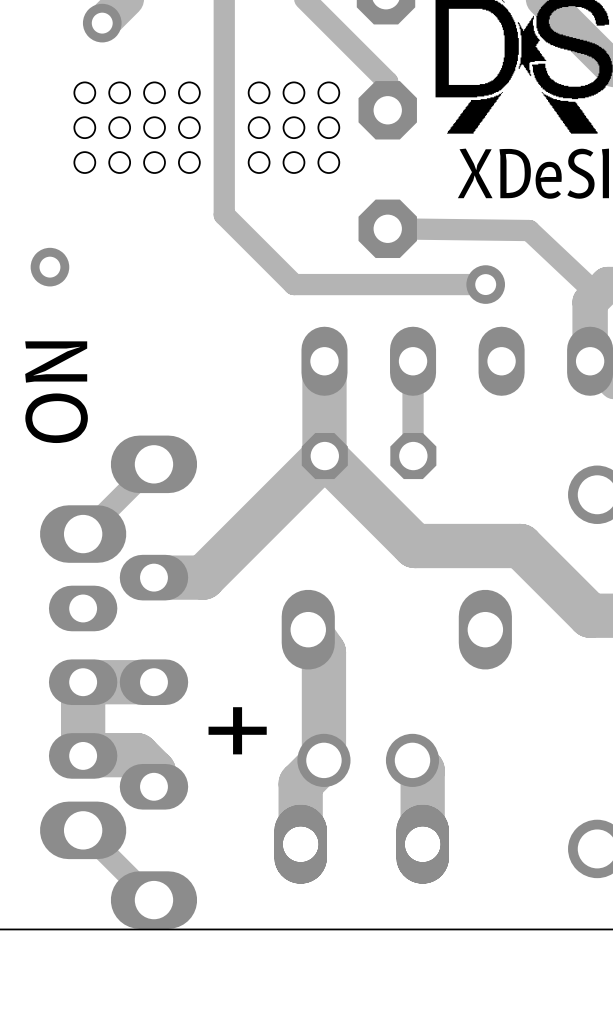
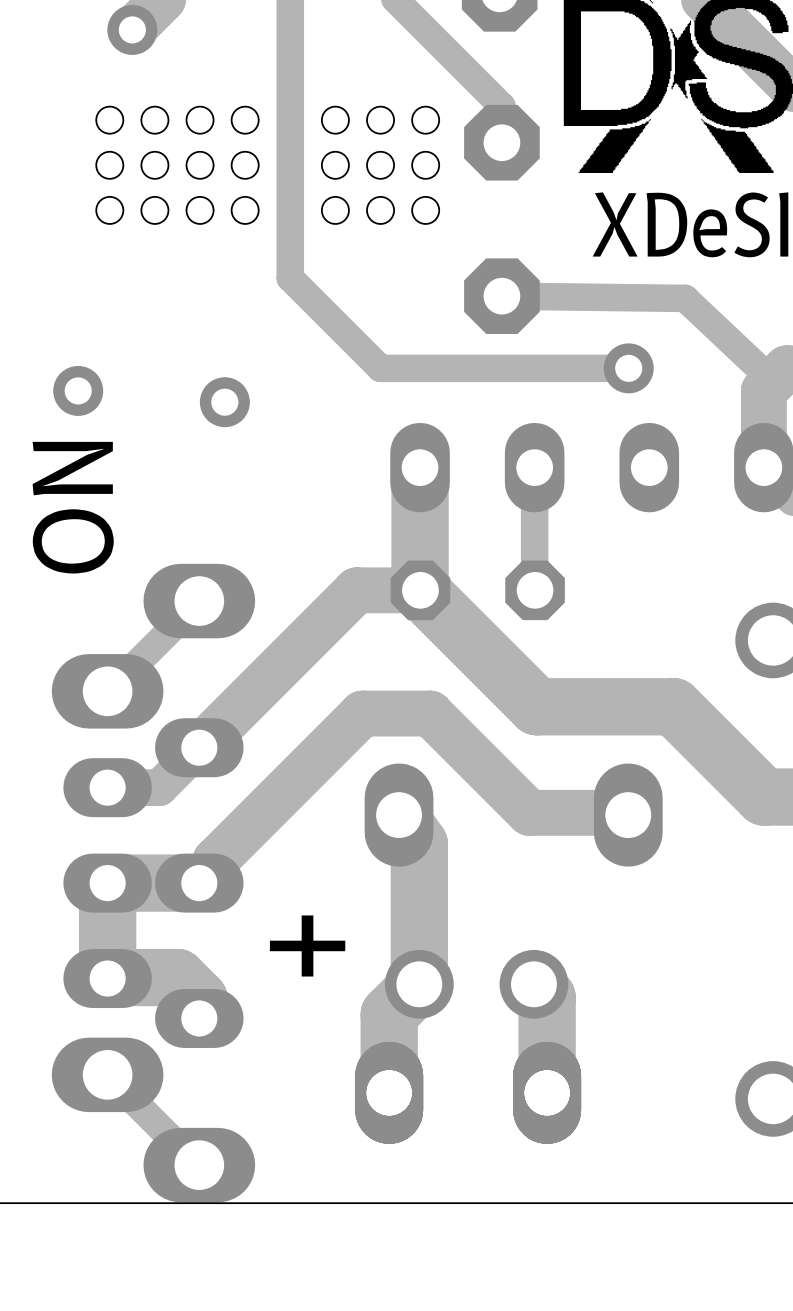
via position: (49, 267) -> (78, 390)
via: none -> (224, 402)
track: (324, 456) (203, 577) (153, 577) -> (420, 590) (356, 590) (159, 787) (107, 787)
track: none -> (628, 815) (626, 812) (529, 812) (430, 713) (362, 713) (215, 860) (215, 883) (199, 883)

